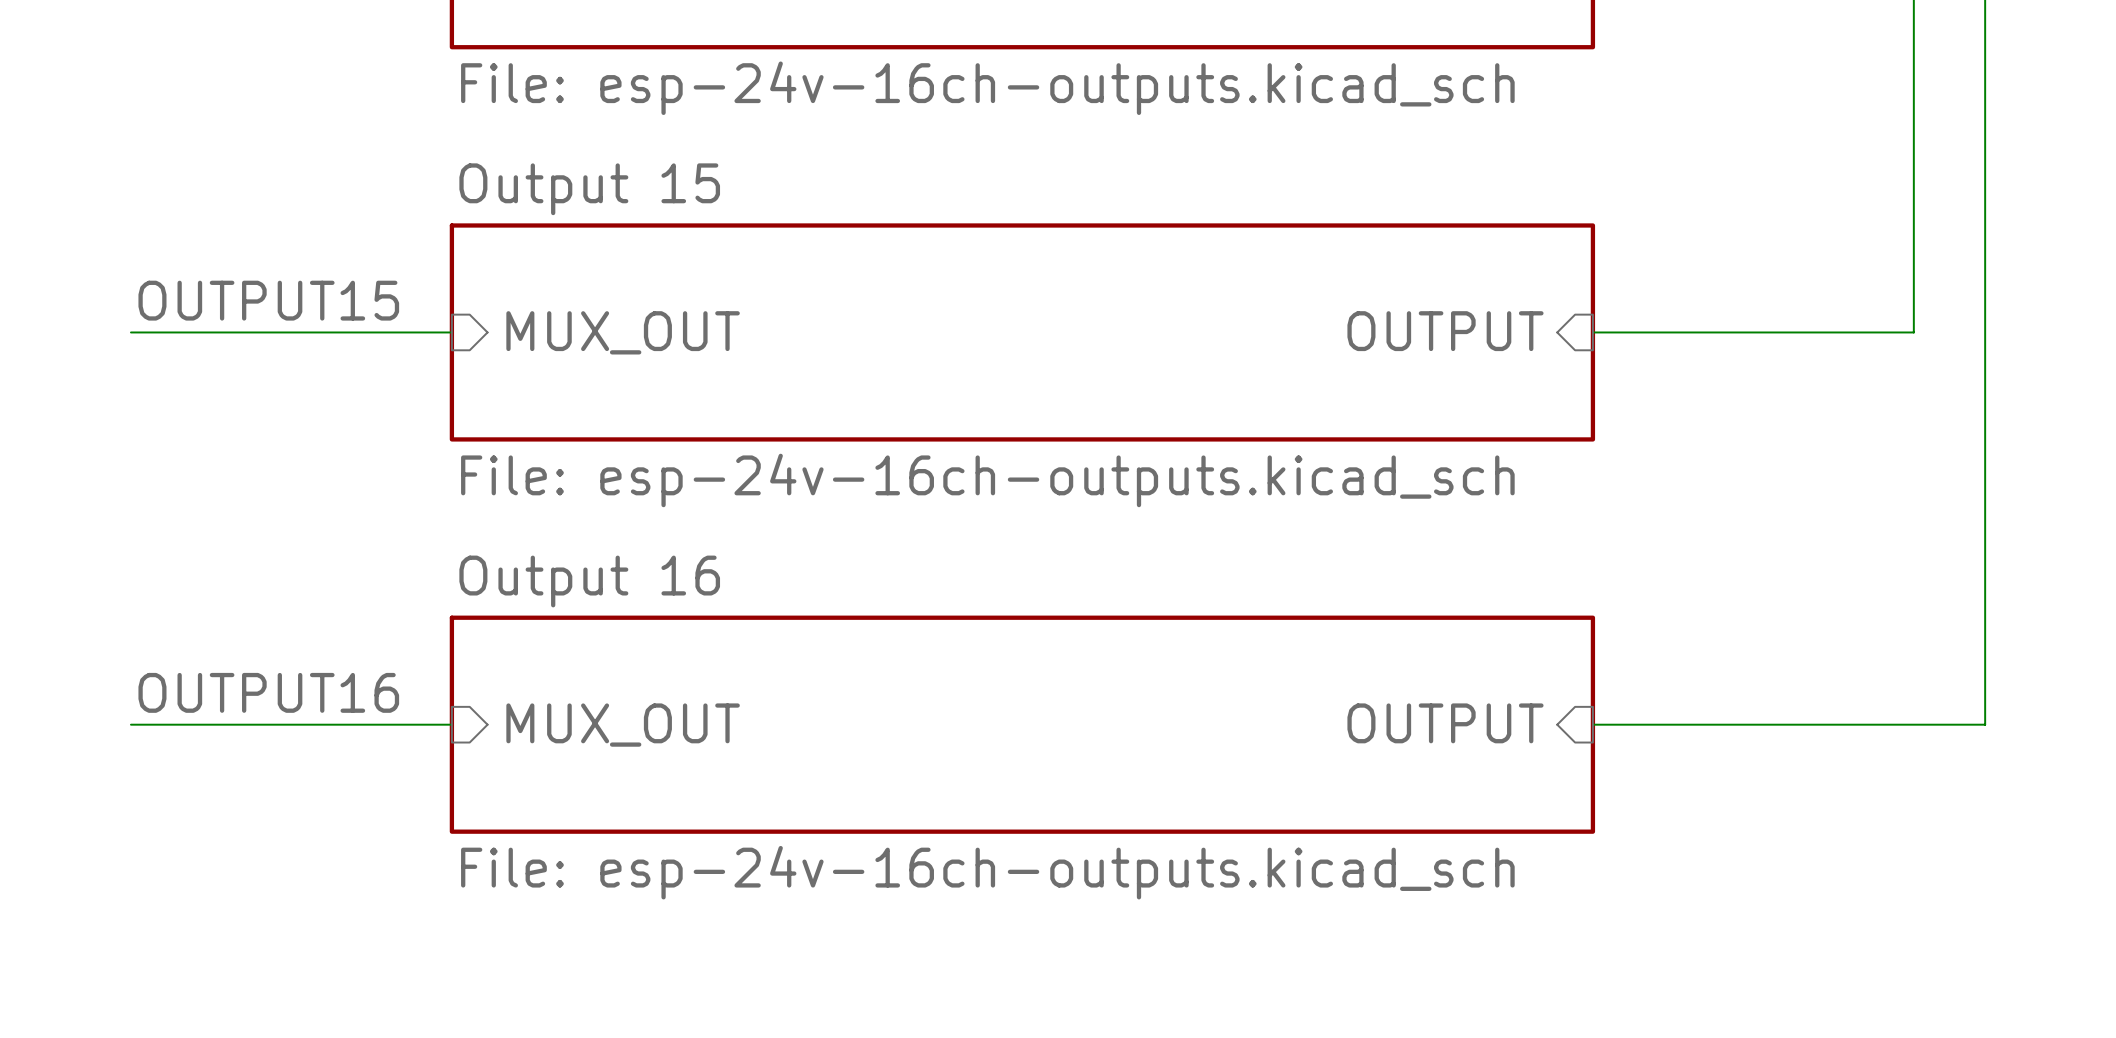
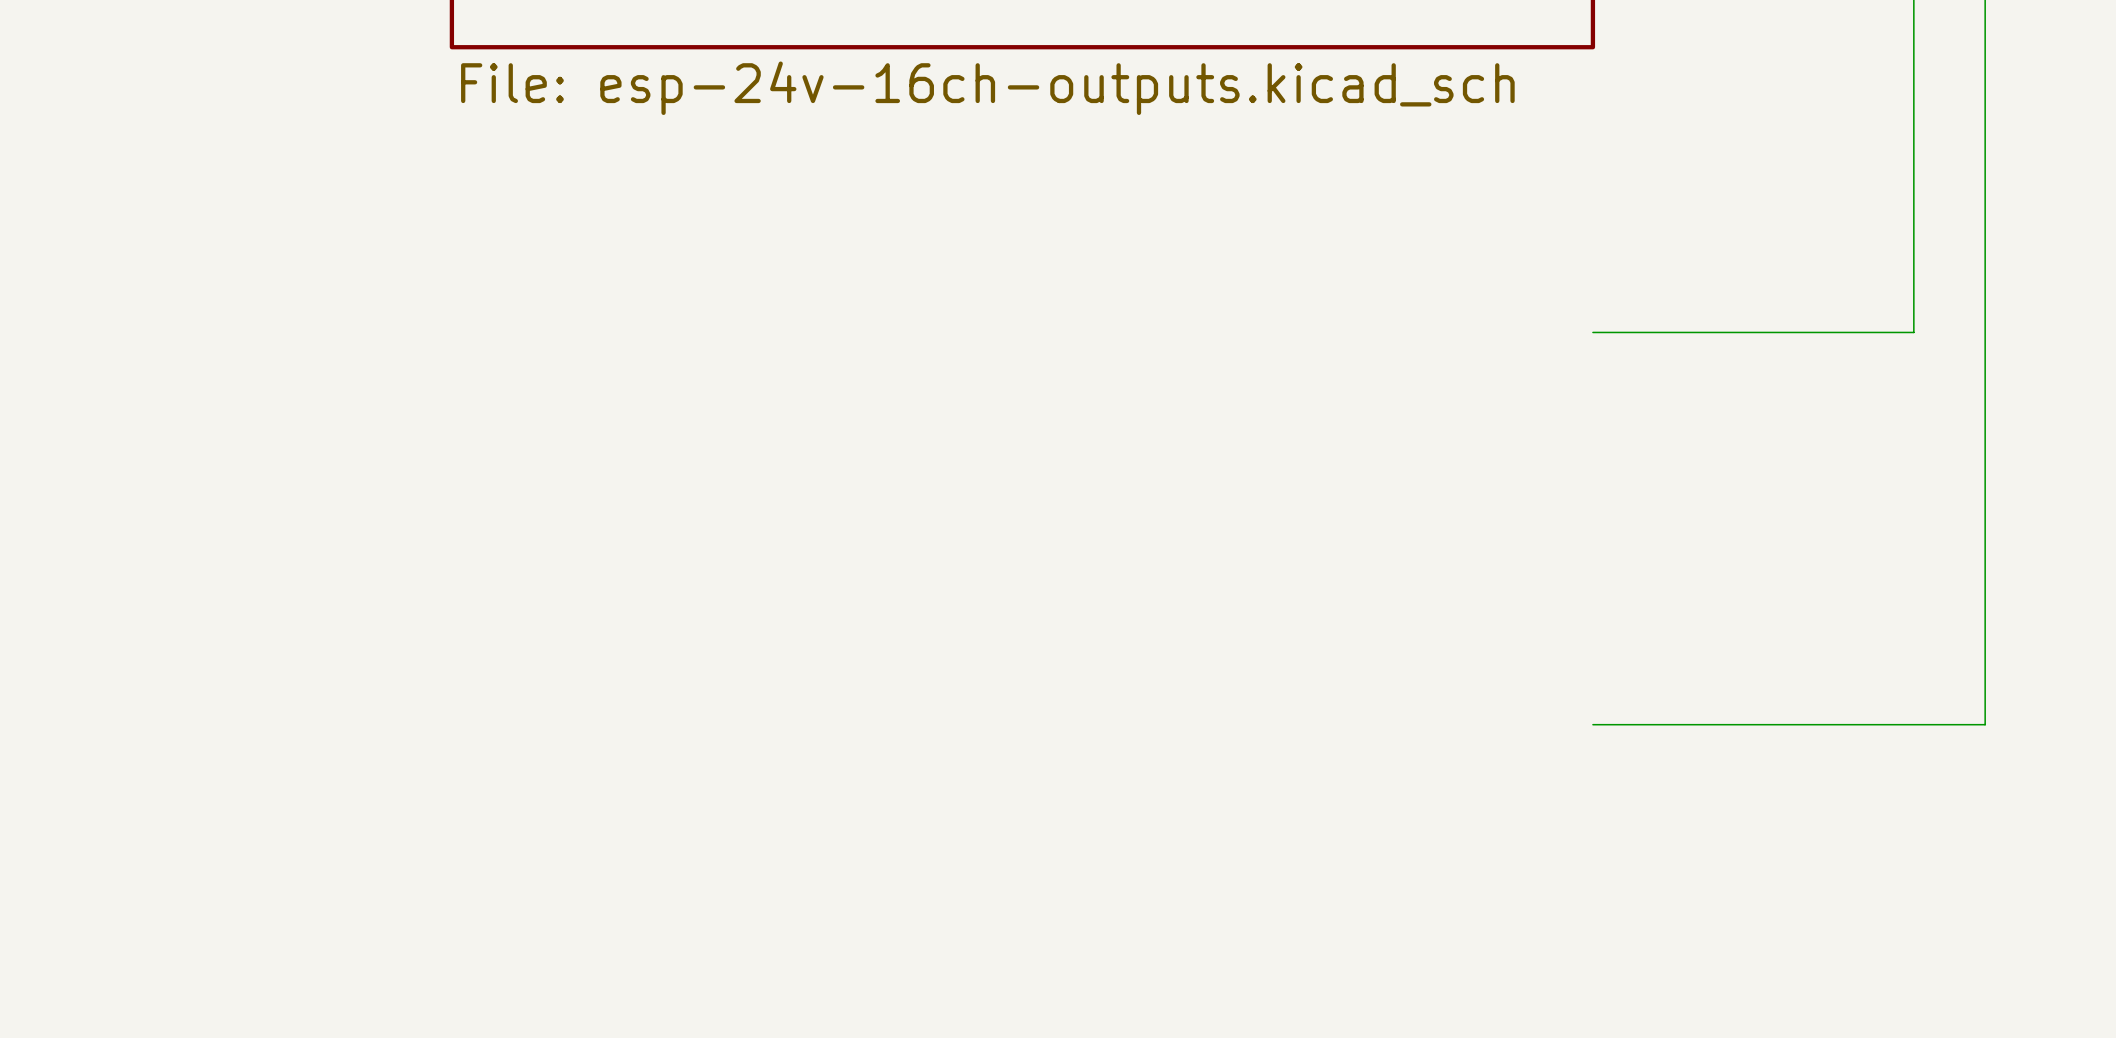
label: OUTPUT15 (268, 300) -> none
sheet pin: OUTPUT (1445, 331) -> none
wire: (130, 332) (451, 332) -> none
sheet pin: MUX_OUT (623, 332) -> none
sheet Output 15: File: esp-24v-16ch-outputs.kicad_sch (1022, 332) -> none
label: OUTPUT16 (268, 692) -> none
sheet pin: OUTPUT (1445, 723) -> none
wire: (130, 724) (451, 724) -> none
sheet Output 16: File: esp-24v-16ch-outputs.kicad_sch (1022, 724) -> none
sheet pin: MUX_OUT (623, 725) -> none

